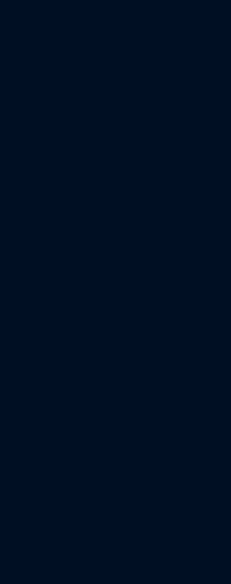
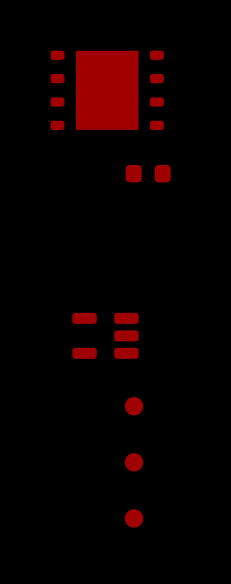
part: none -> (107, 90)
part: none -> (148, 173)
part: none -> (105, 335)
part: none -> (134, 406)
part: none -> (134, 462)
part: none -> (134, 518)

